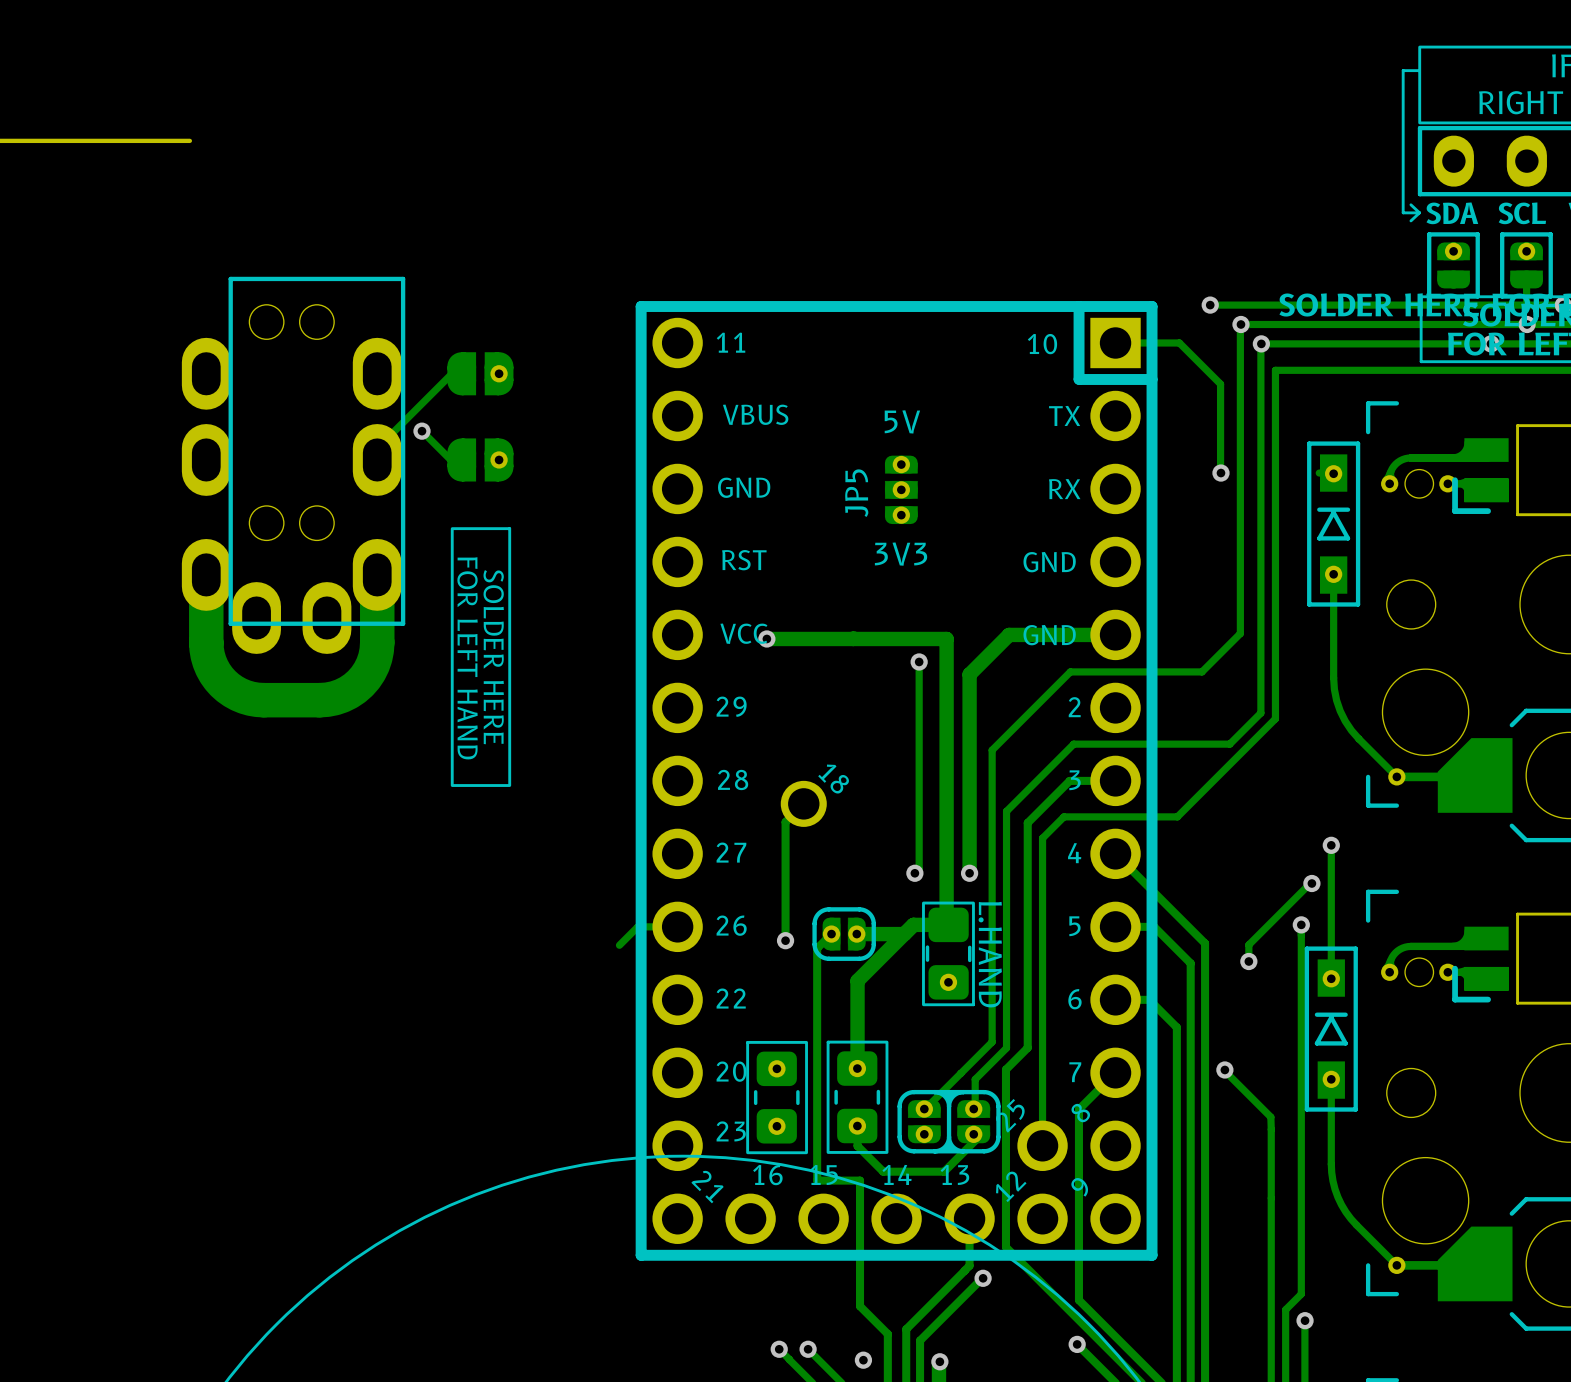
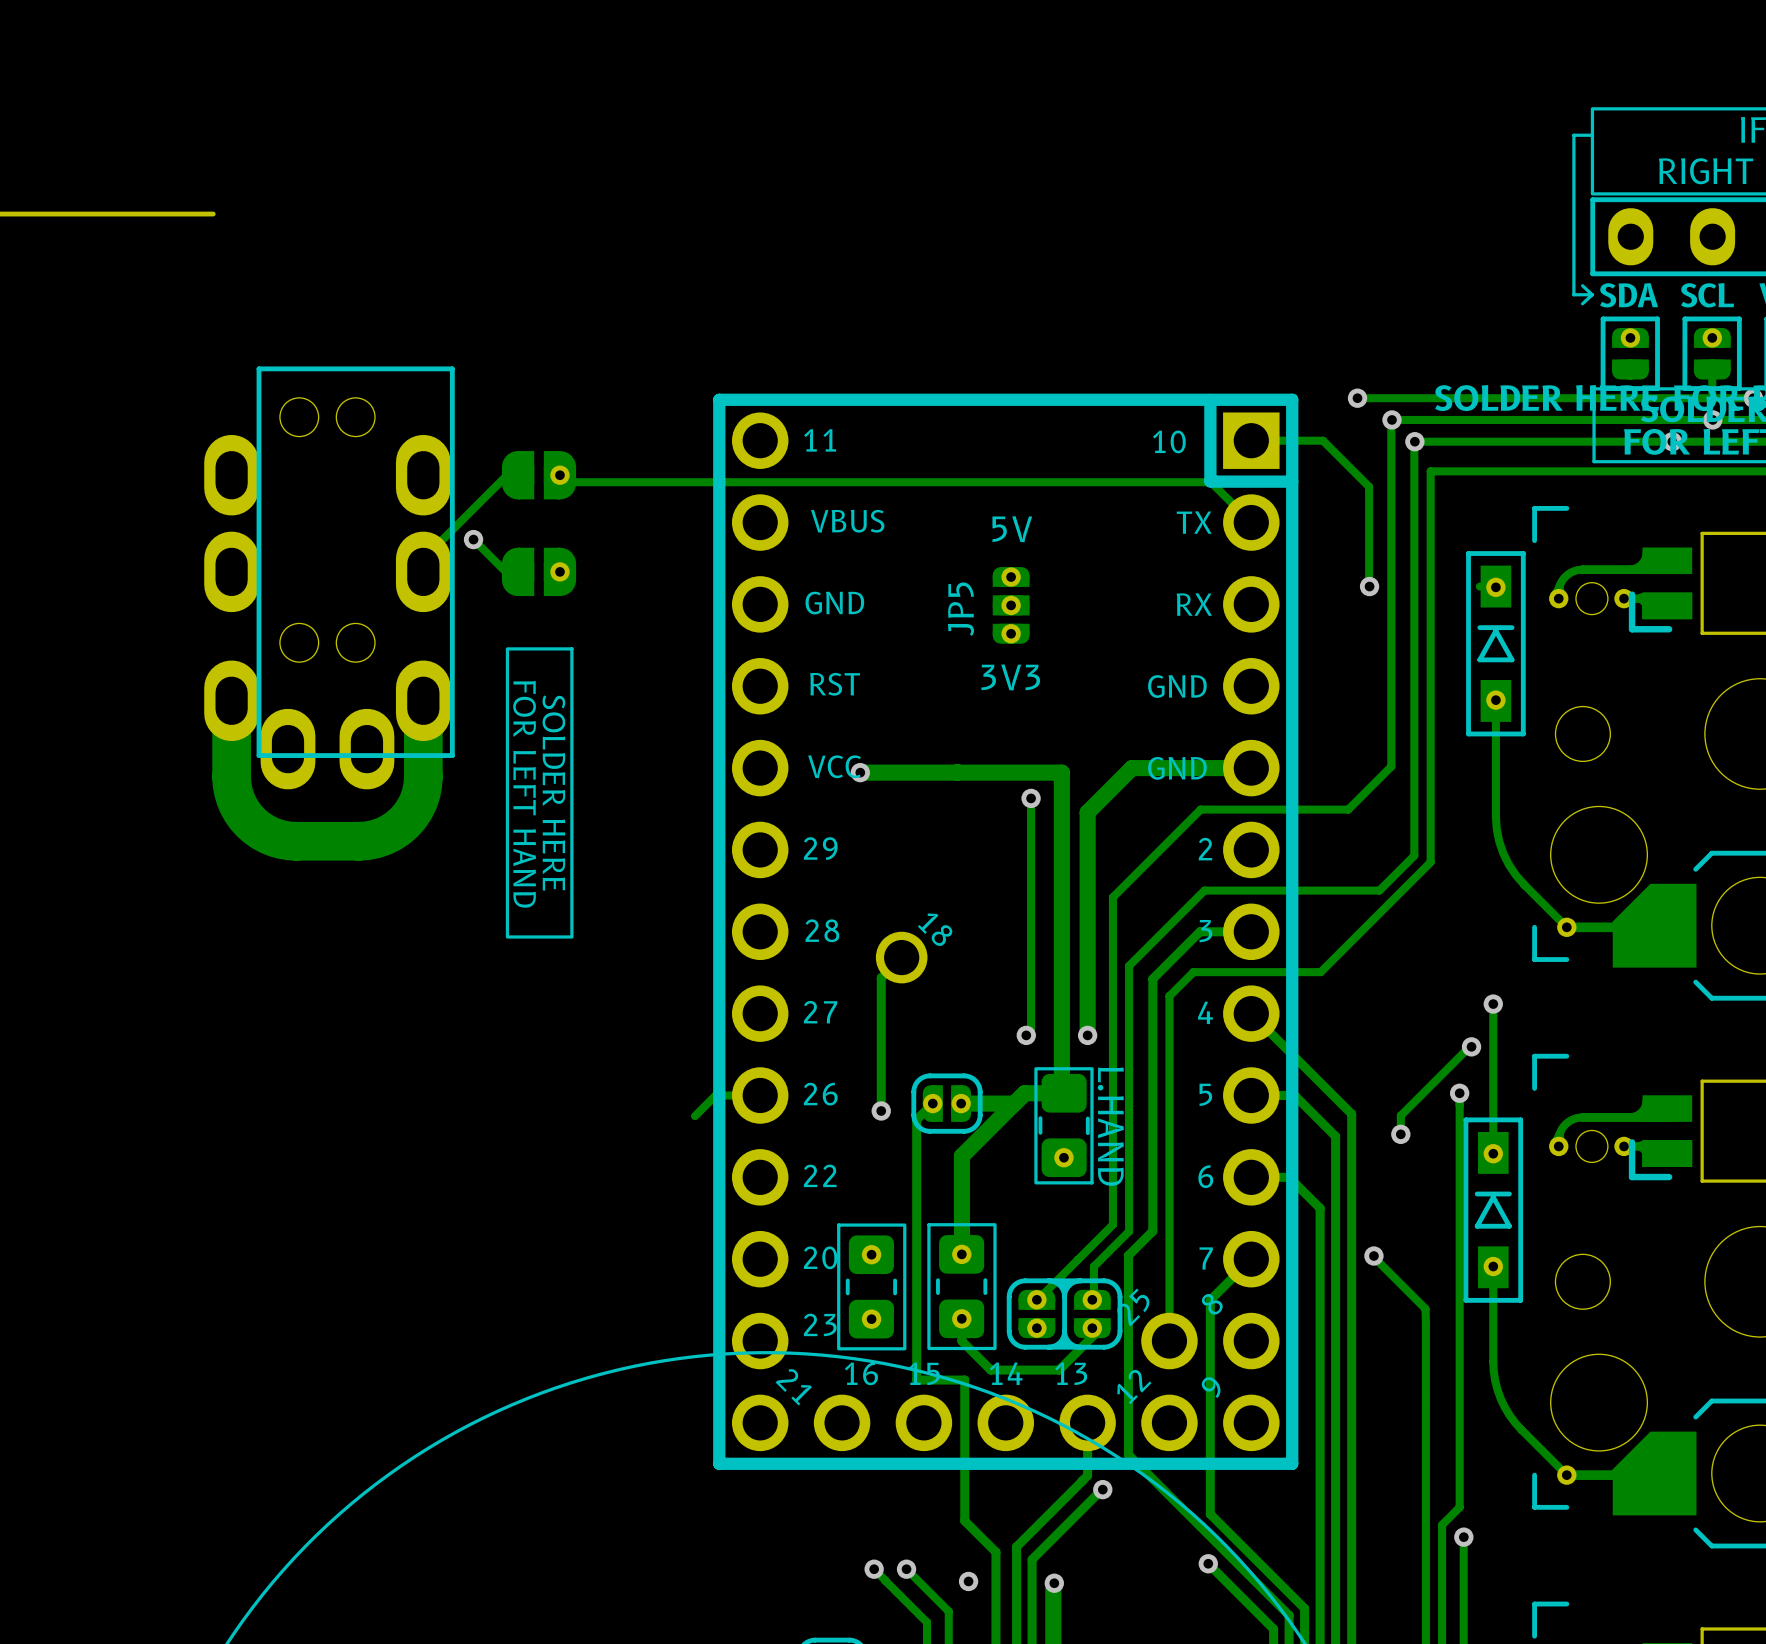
track: none -> (559, 475) (566, 482) (1210, 482) (1251, 522)

